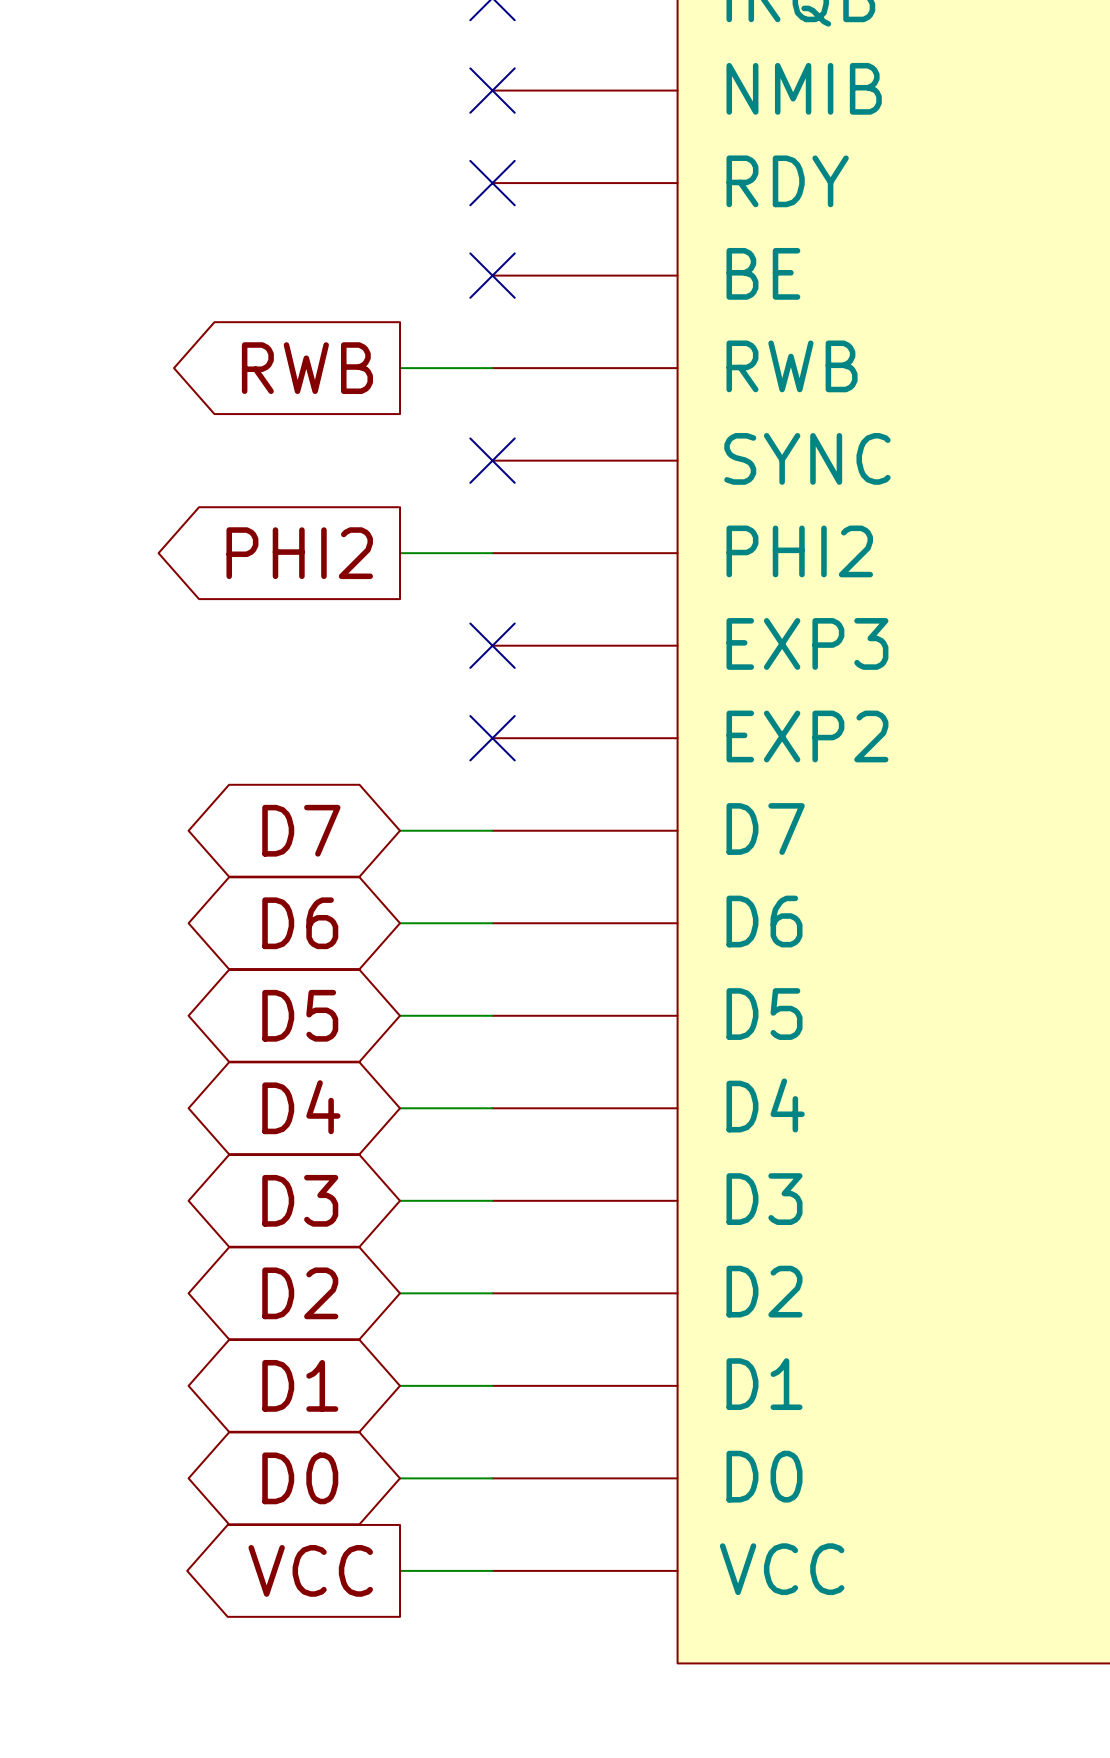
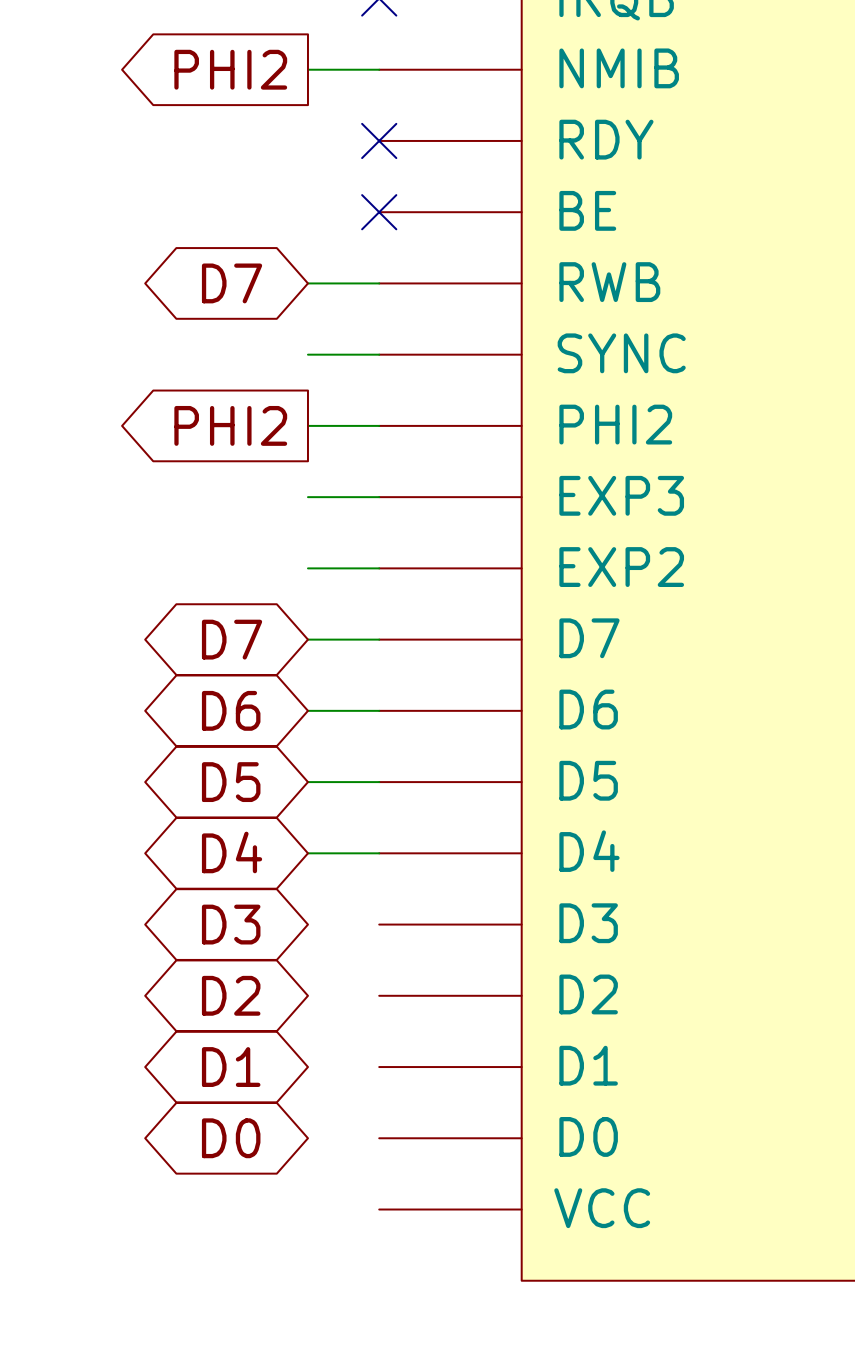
global label: none -> PHI2 (230, 69)
wire: none -> (307, 69) (379, 69)
no-connect mark: (492, 90) -> none
global label shape: output (307, 368) -> bidirectional (232, 283)
global label: RWB (307, 368) -> D7 (232, 283)
no-connect mark: (492, 460) -> none
no-connect mark: (492, 645) -> none
no-connect mark: (492, 738) -> none
wire: (400, 1200) (492, 1200) -> (307, 354) (379, 354)
wire: (400, 1293) (492, 1293) -> none
wire: (400, 1385) (492, 1385) -> (307, 497) (379, 497)
wire: (400, 1478) (492, 1478) -> (307, 568) (379, 568)
global label: VCC (310, 1570) -> none
wire: (400, 1570) (492, 1570) -> none

